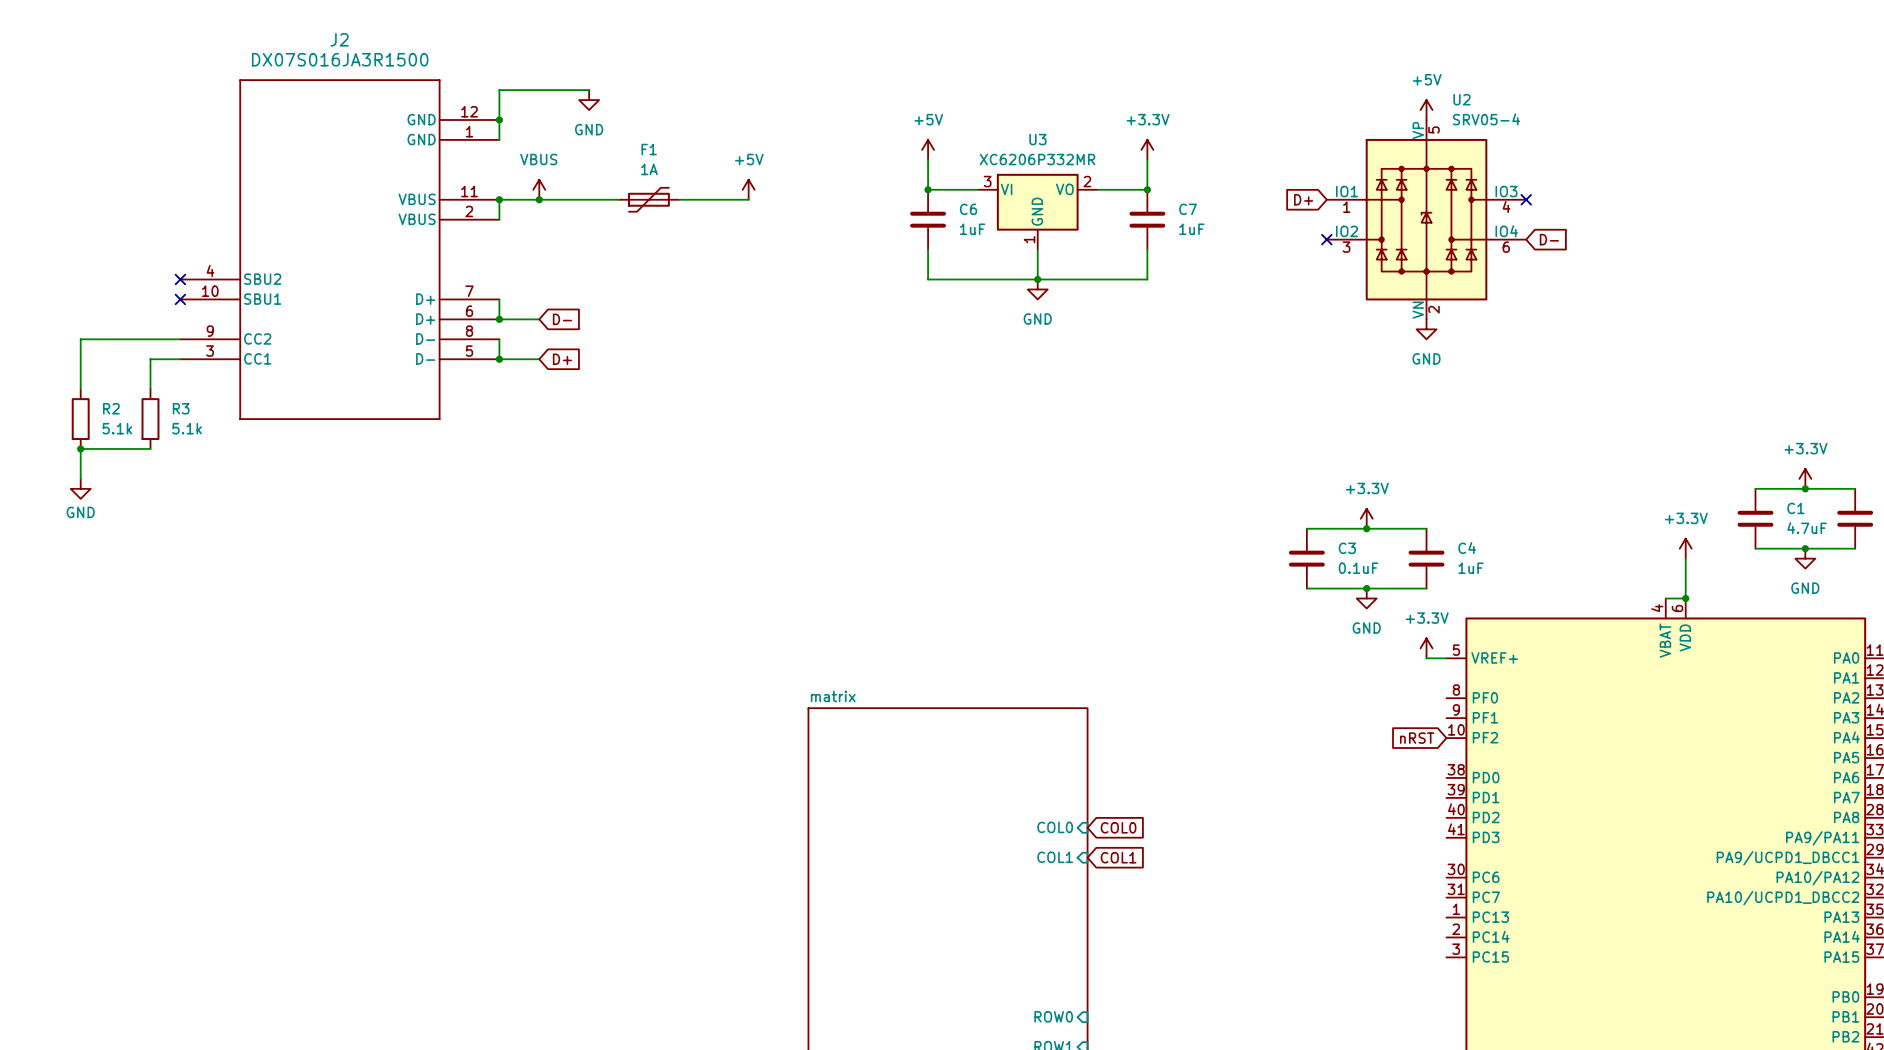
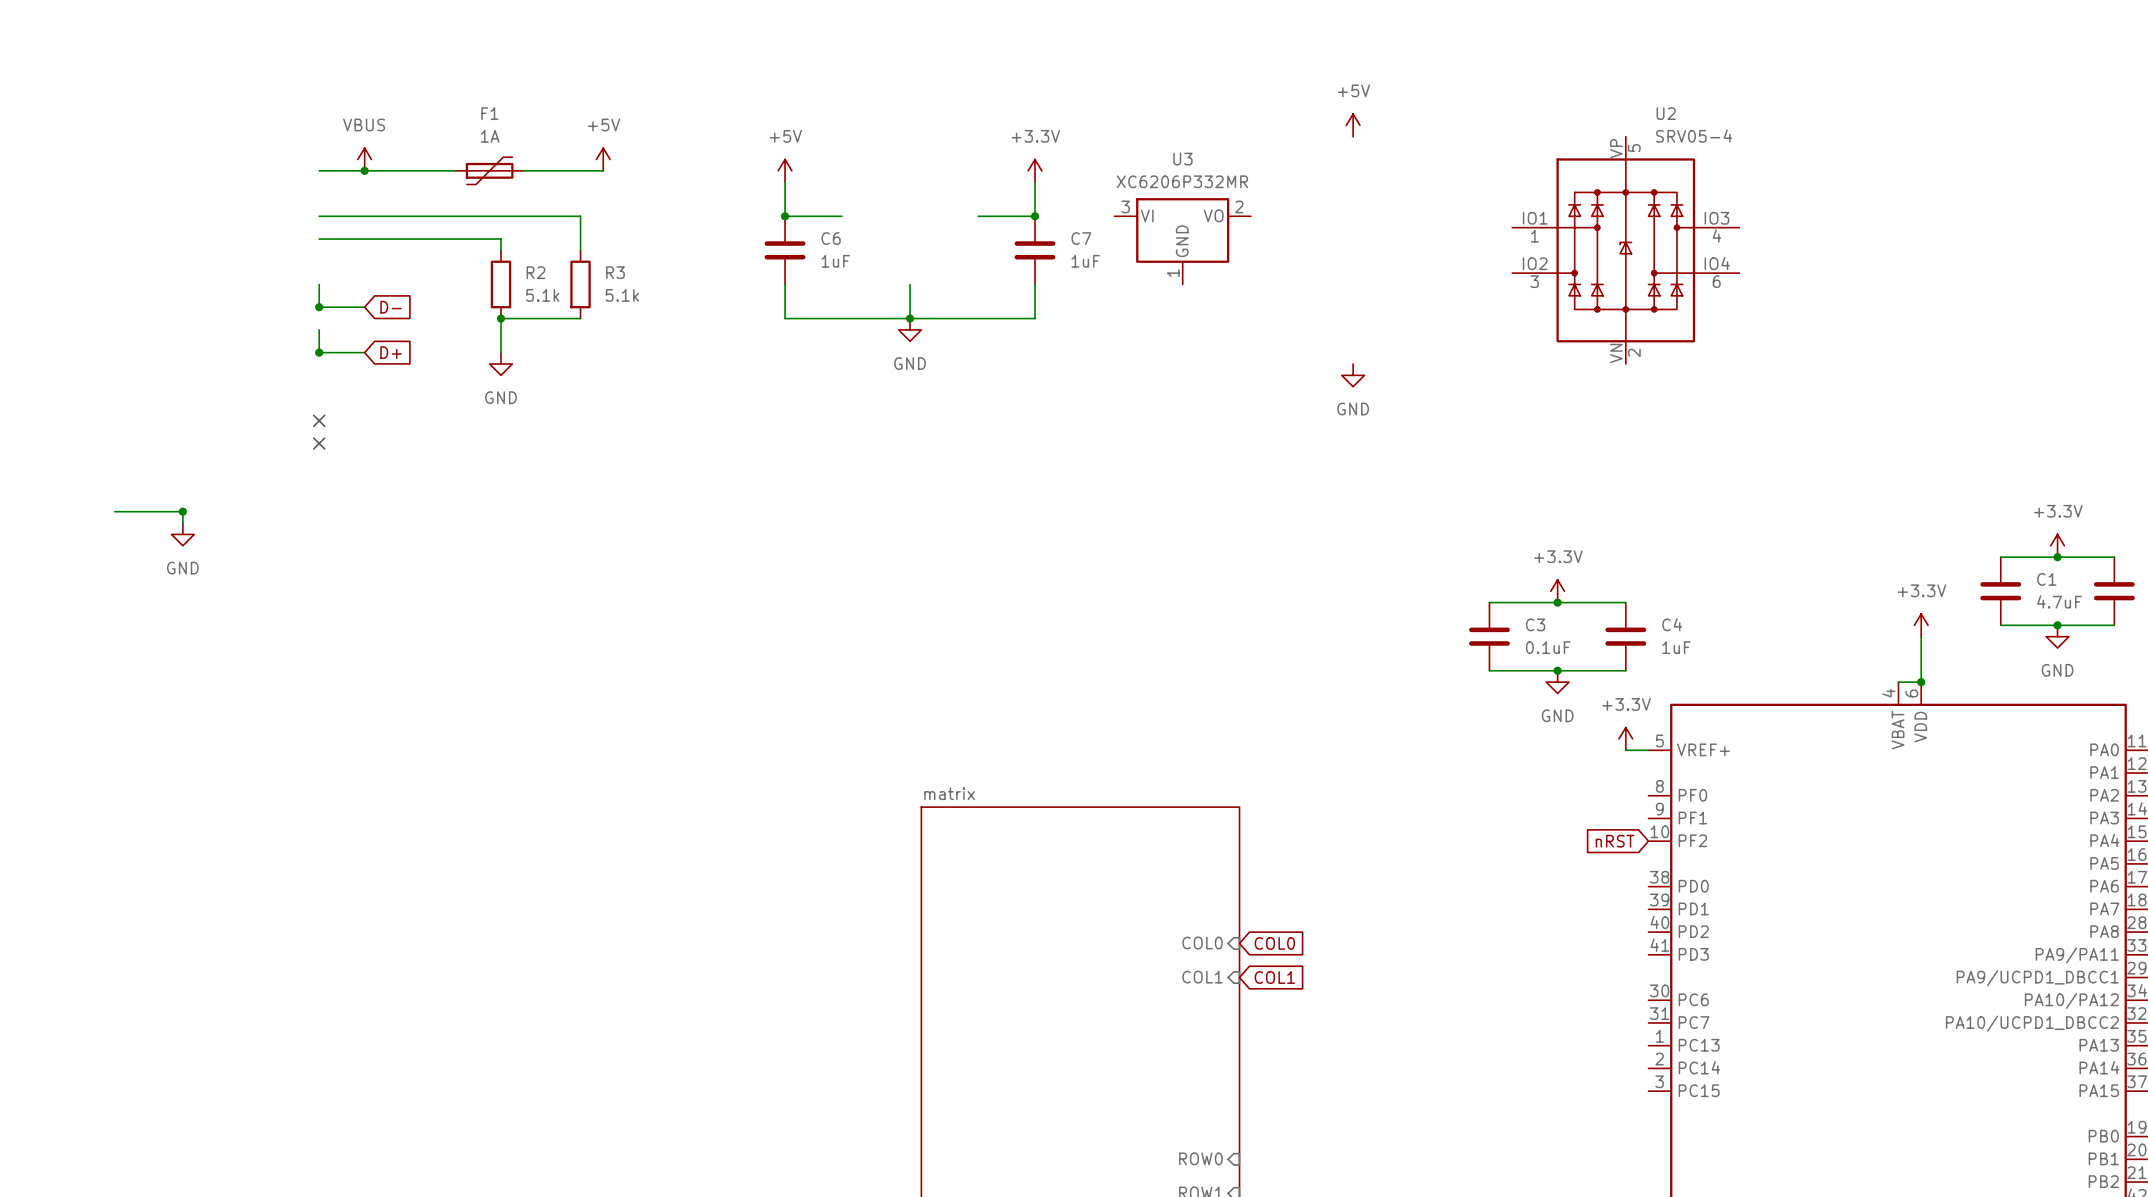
wire: (589, 90) (499, 90) (499, 139) -> none
power symbol: GND (589, 100) -> none
power symbol: none -> +5V (1353, 125)
power symbol: +5V (1426, 110) -> none
junction: (499, 120) -> none
power symbol: none -> VBUS (364, 159)
power symbol: none -> +5V (603, 159)
wire: none -> (319, 170) (455, 170)
junction: none -> (364, 170)
wire: none -> (523, 170) (603, 170)
power symbol: none -> +3.3V (1034, 170)
power symbol: +5V (928, 149) -> none
power symbol: +3.3V (1147, 149) -> none
wire: none -> (785, 182) (785, 216) (841, 216)
wire: none -> (1034, 182) (1034, 216) (978, 216)
wire: (928, 159) (928, 189) (977, 189) -> none
wire: (1147, 159) (1147, 189) (1097, 189) -> none
wire: none -> (319, 216) (580, 216) (580, 250)
power symbol: VBUS (539, 189) -> none
junction: none -> (785, 216)
power symbol position: +5V (748, 189) -> +5V (785, 170)
junction position: (928, 189) -> (1034, 216)
junction: (1147, 189) -> none
junction: (499, 199) -> none
junction: (539, 199) -> none
wire: (619, 199) (499, 199) (499, 219) -> none
F1 position: (648, 199) -> (489, 170)
wire: (678, 199) (748, 199) -> none
global label: D+ (1303, 199) -> none
no-connect mark: (1526, 199) -> none
wire: none -> (319, 239) (501, 239) (501, 250)
C6 position: (928, 219) -> (785, 250)
C7 position: (1147, 219) -> (1034, 250)
no-connect mark: (1326, 239) -> none
global label: D- (1549, 239) -> none
wire: none -> (319, 284) (319, 307) (364, 307)
J2: DX07S016JA3R1500 (339, 249) -> none
wire: none -> (785, 284) (785, 318) (1034, 318) (1034, 284)
wire: none -> (910, 284) (910, 318)
wire: (928, 249) (928, 279) (1147, 279) (1147, 249) -> none
wire: (1037, 249) (1037, 279) -> none
junction: none -> (319, 307)
global label: none -> D- (391, 307)
no-connect mark: (180, 279) -> none
junction: none -> (501, 318)
wire: none -> (580, 318) (501, 318) (501, 352)
junction: none -> (910, 318)
junction: (1037, 279) -> none
wire: none -> (319, 329) (319, 352) (364, 352)
power symbol: none -> GND (910, 329)
power symbol: GND (1037, 289) -> none
no-connect mark: (180, 299) -> none
wire: (499, 299) (499, 319) (539, 319) -> none
junction: none -> (319, 352)
global label: none -> D+ (391, 352)
power symbol: none -> GND (501, 364)
junction: (499, 319) -> none
global label: D- (562, 319) -> none
power symbol: none -> GND (1353, 375)
power symbol: GND (1426, 329) -> none
wire: (180, 339) (80, 339) (80, 389) -> none
wire: (499, 339) (499, 359) (539, 359) -> none
wire: (180, 359) (150, 359) (150, 389) -> none
junction: (499, 359) -> none
global label: D+ (562, 359) -> none
no-connect mark: none -> (319, 420)
no-connect mark: none -> (319, 443)
R2 position: (80, 419) -> (501, 284)
R3 position: (150, 419) -> (580, 284)
junction: (80, 448) -> none
wire: (100, 448) (80, 448) (80, 478) -> none
wire: none -> (171, 511) (182, 511) (182, 523)
junction: none -> (182, 511)
power symbol position: GND (80, 488) -> GND (182, 534)
power symbol text position: GND (80, 512) -> GND (182, 568)

